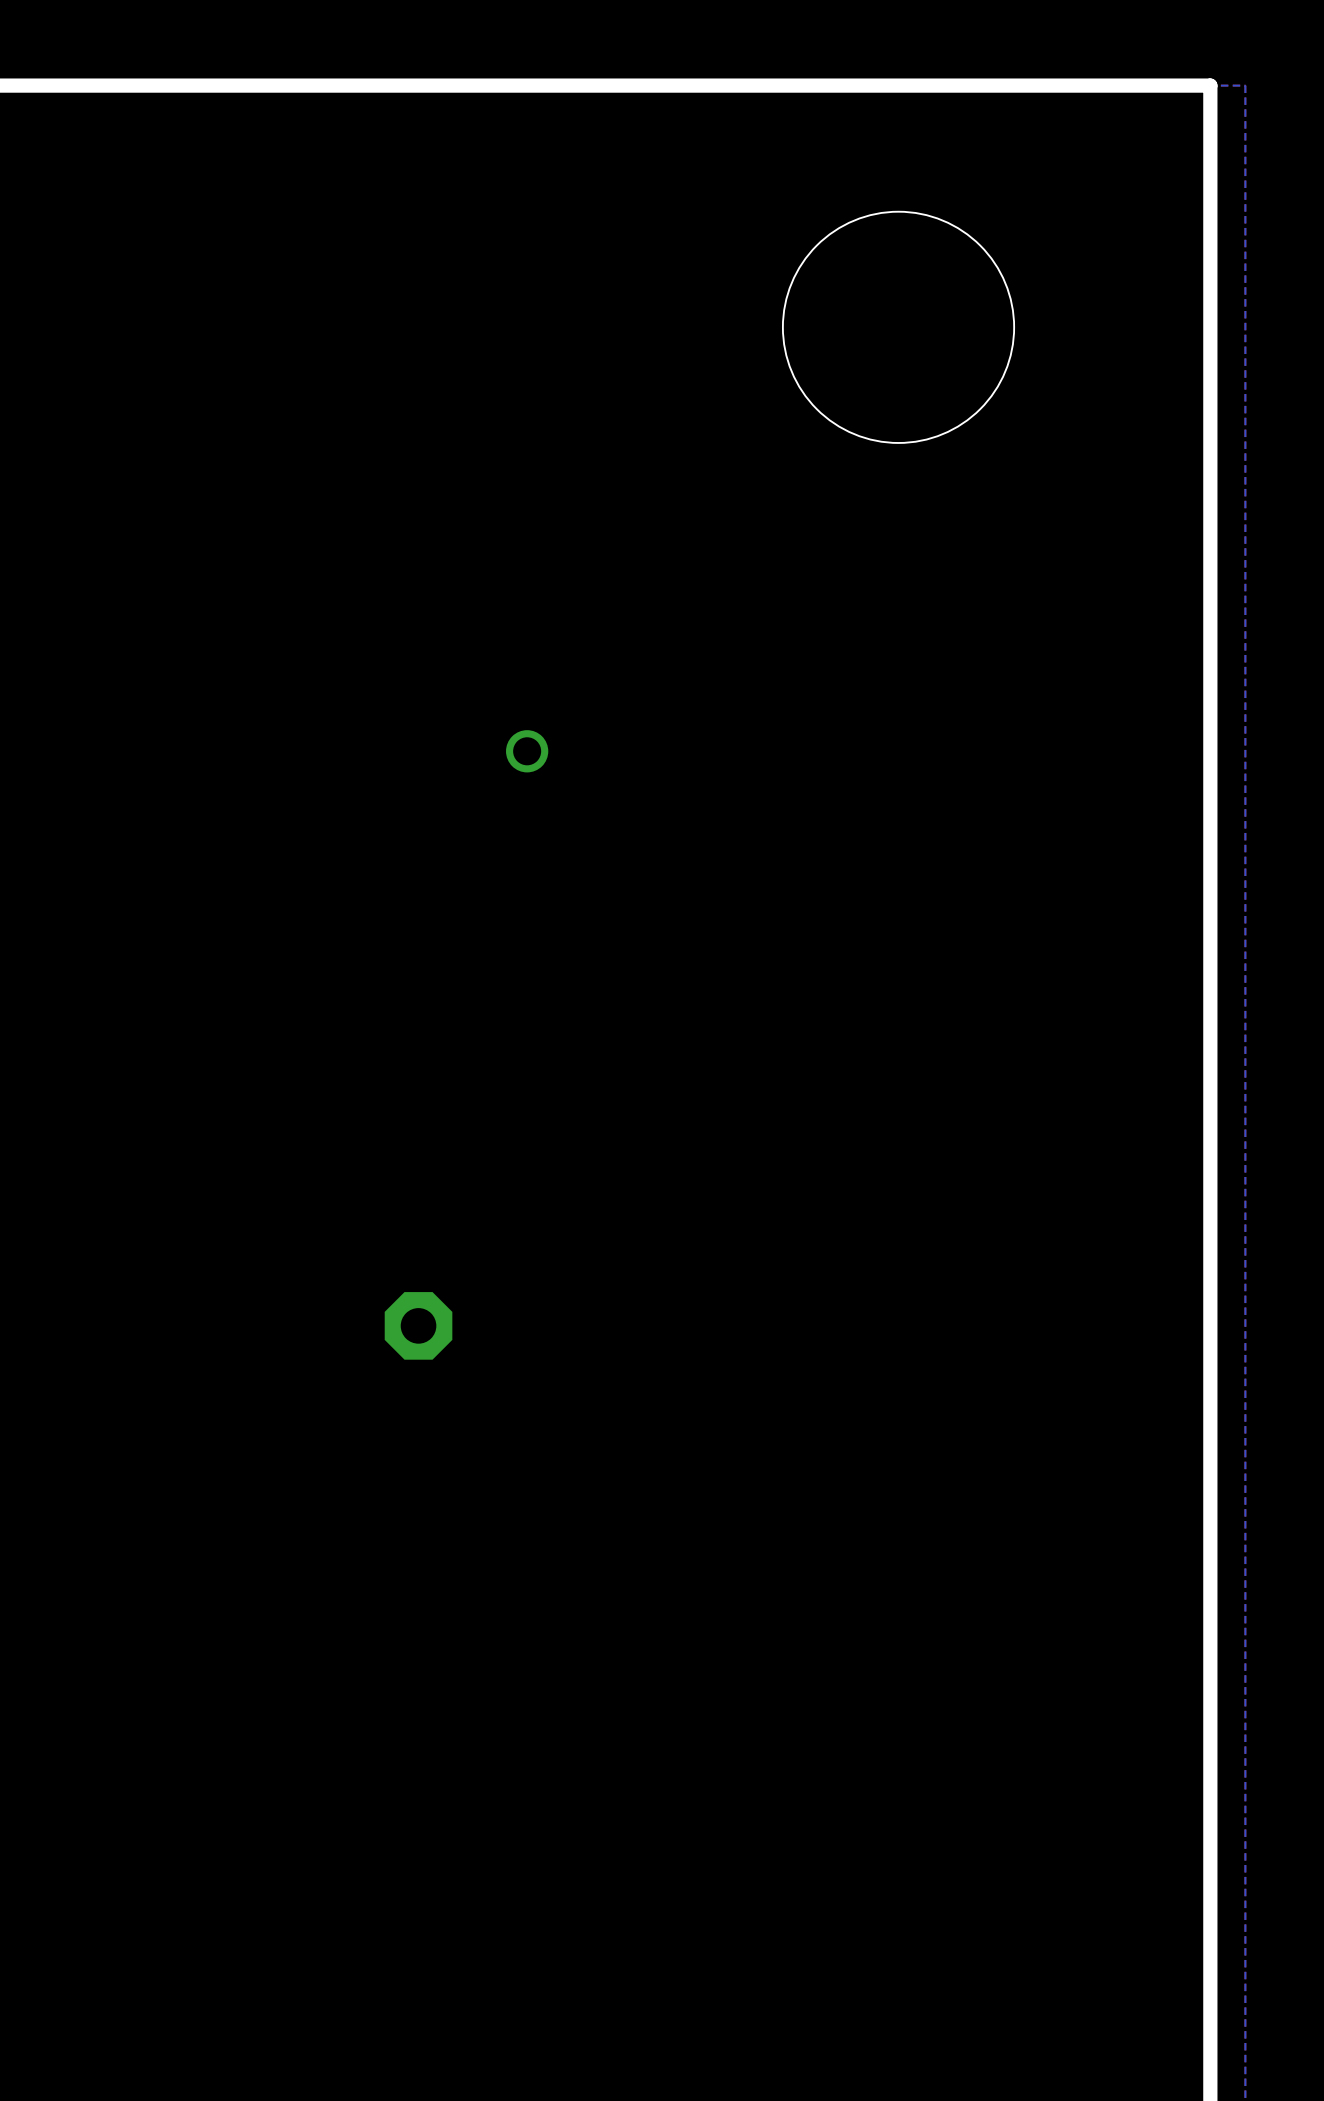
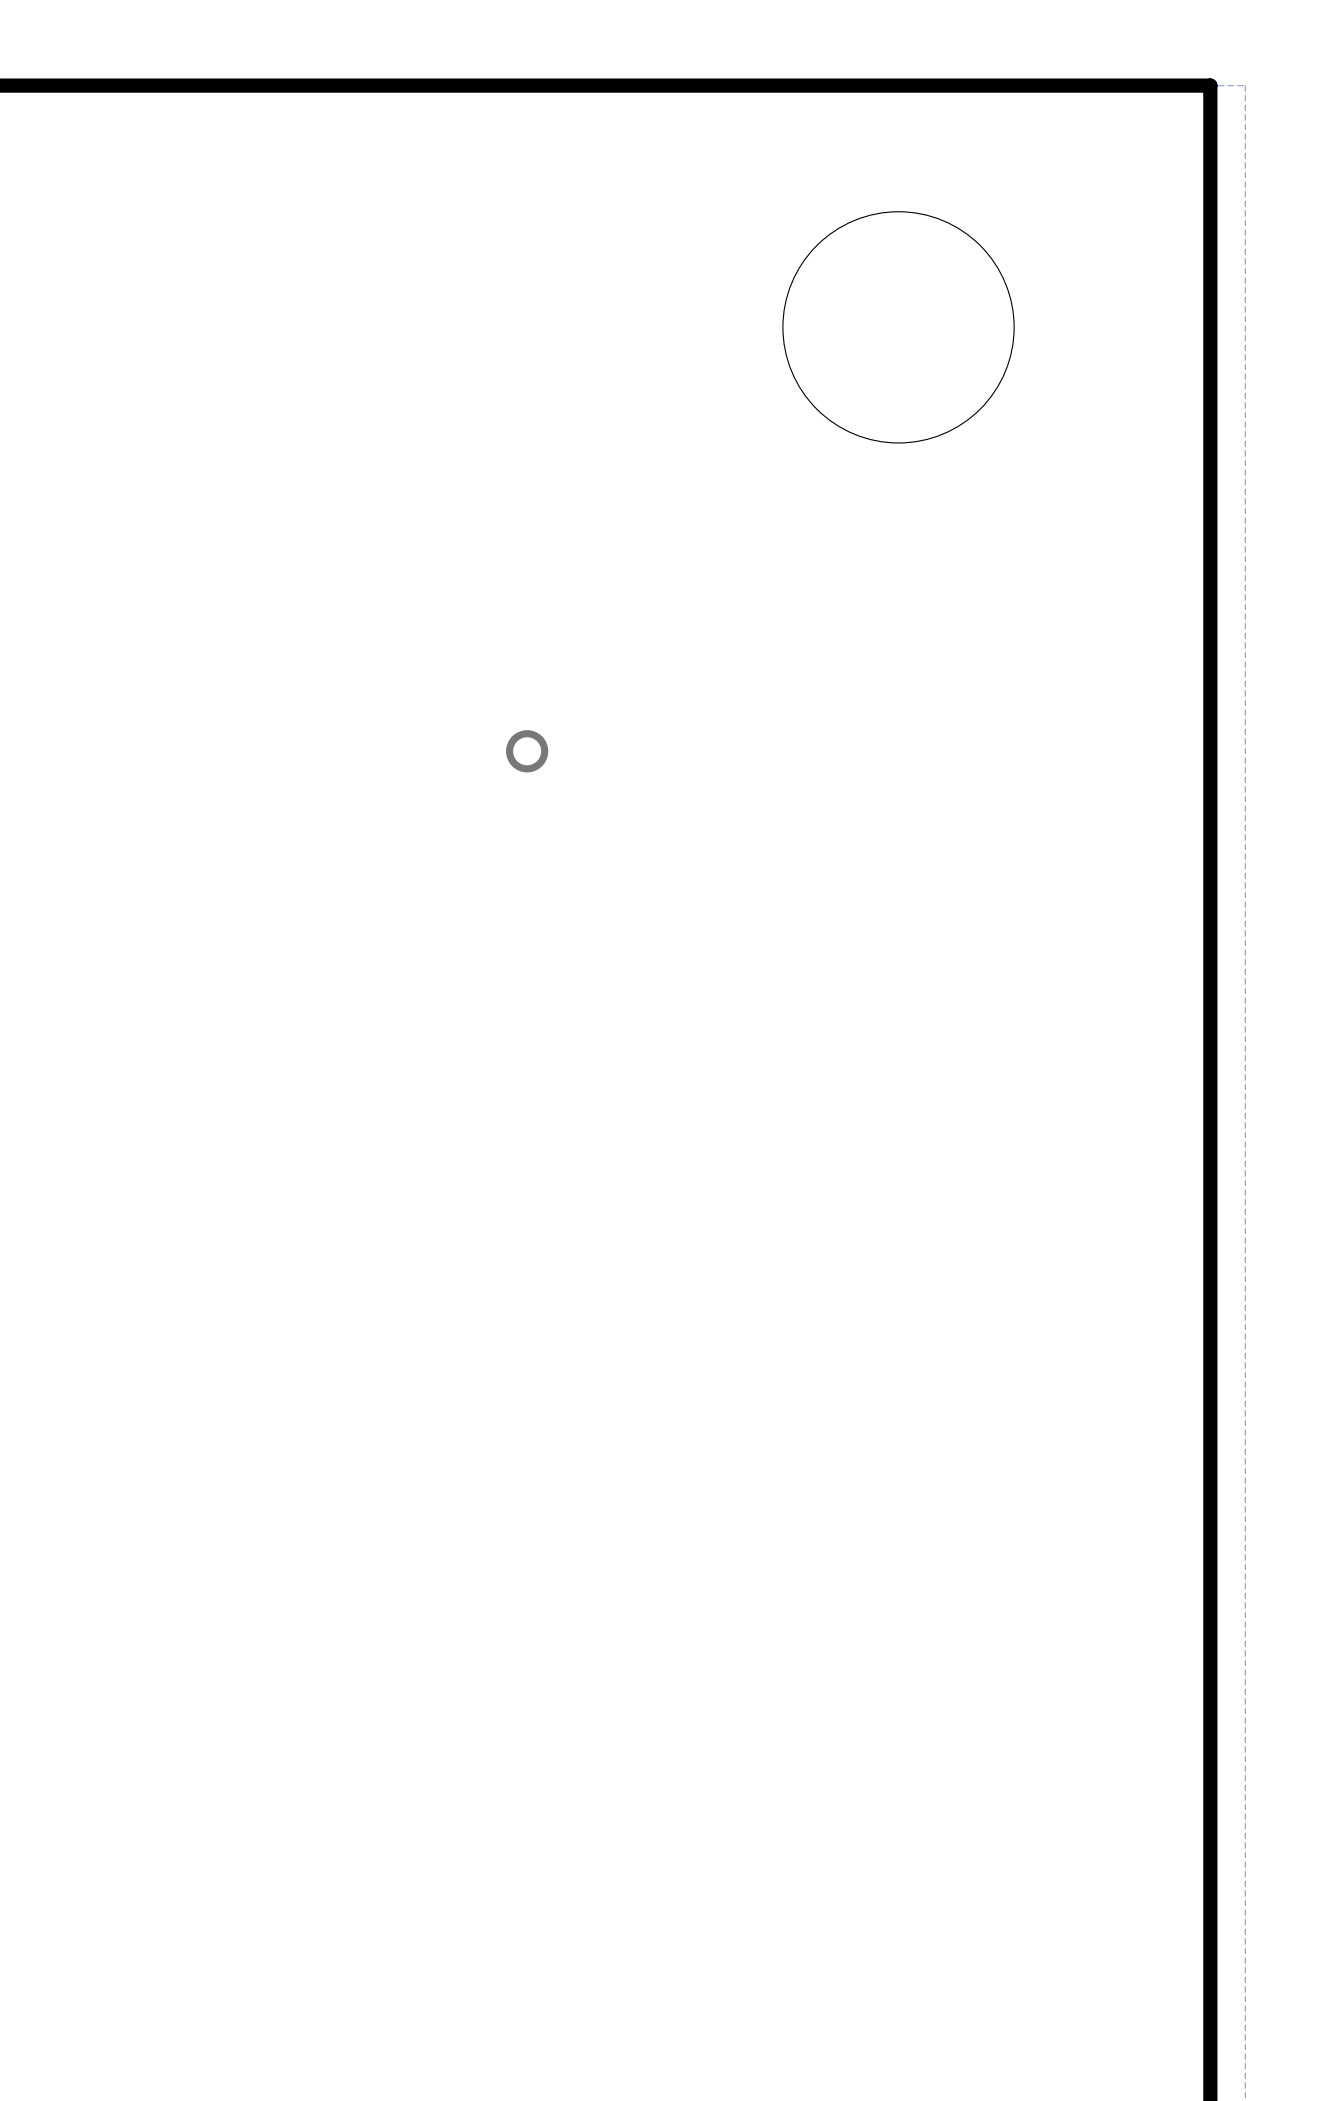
part: (418, 1325) -> none

